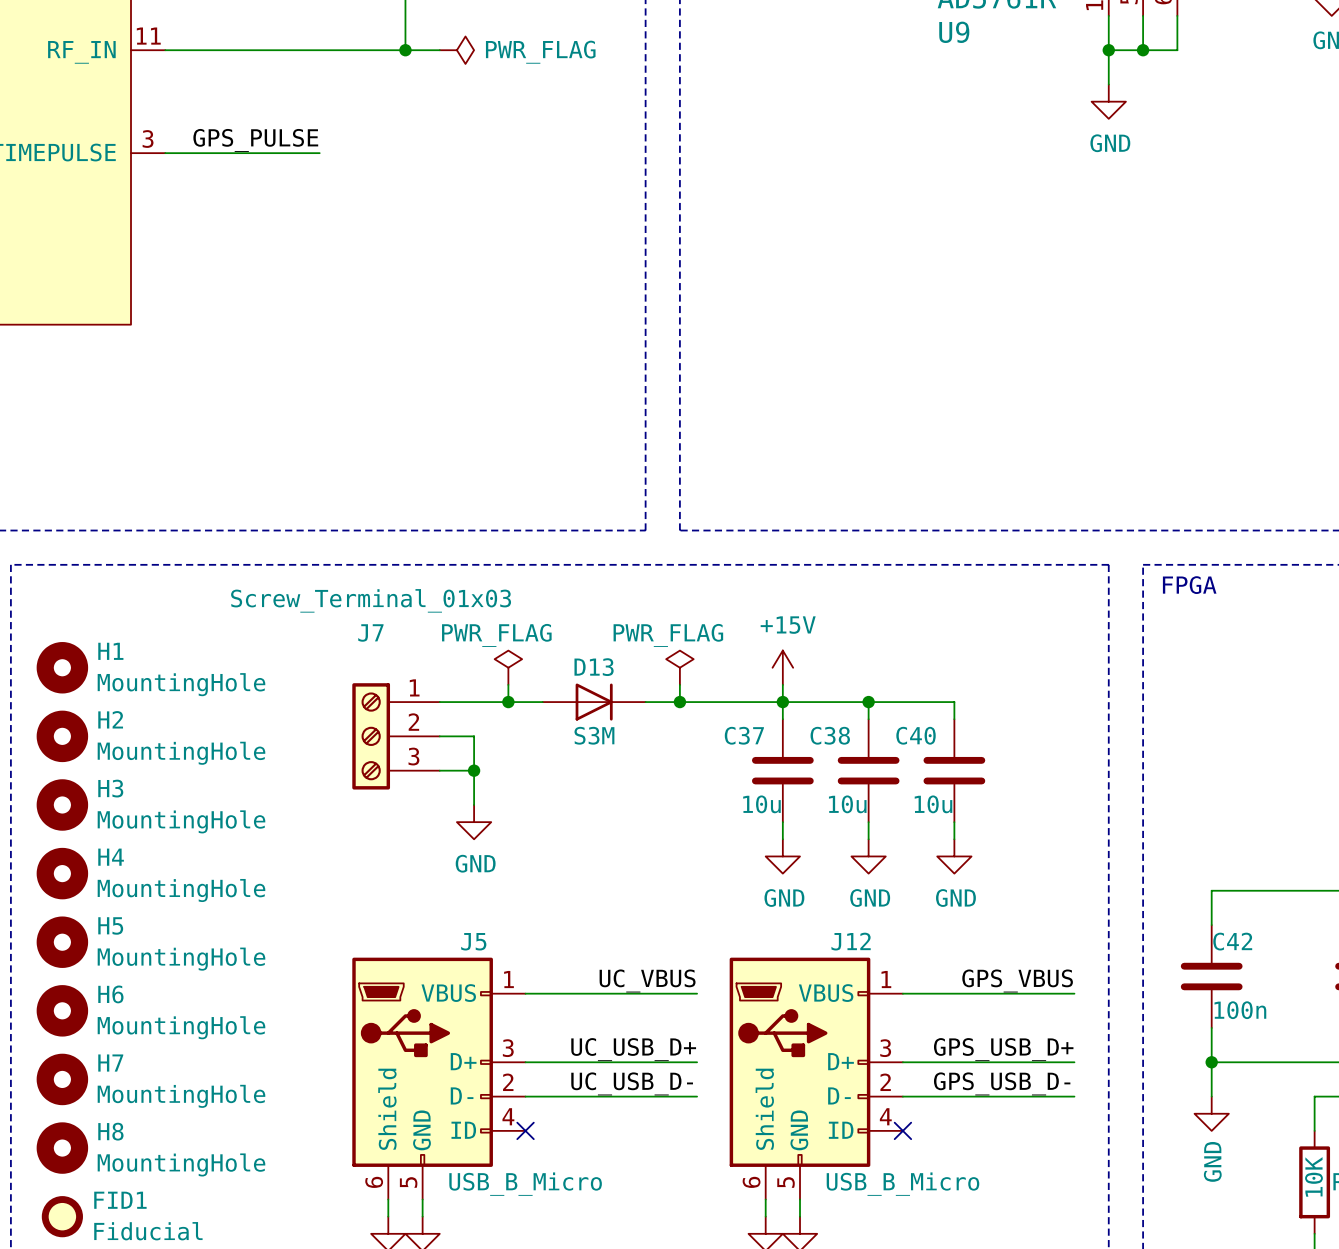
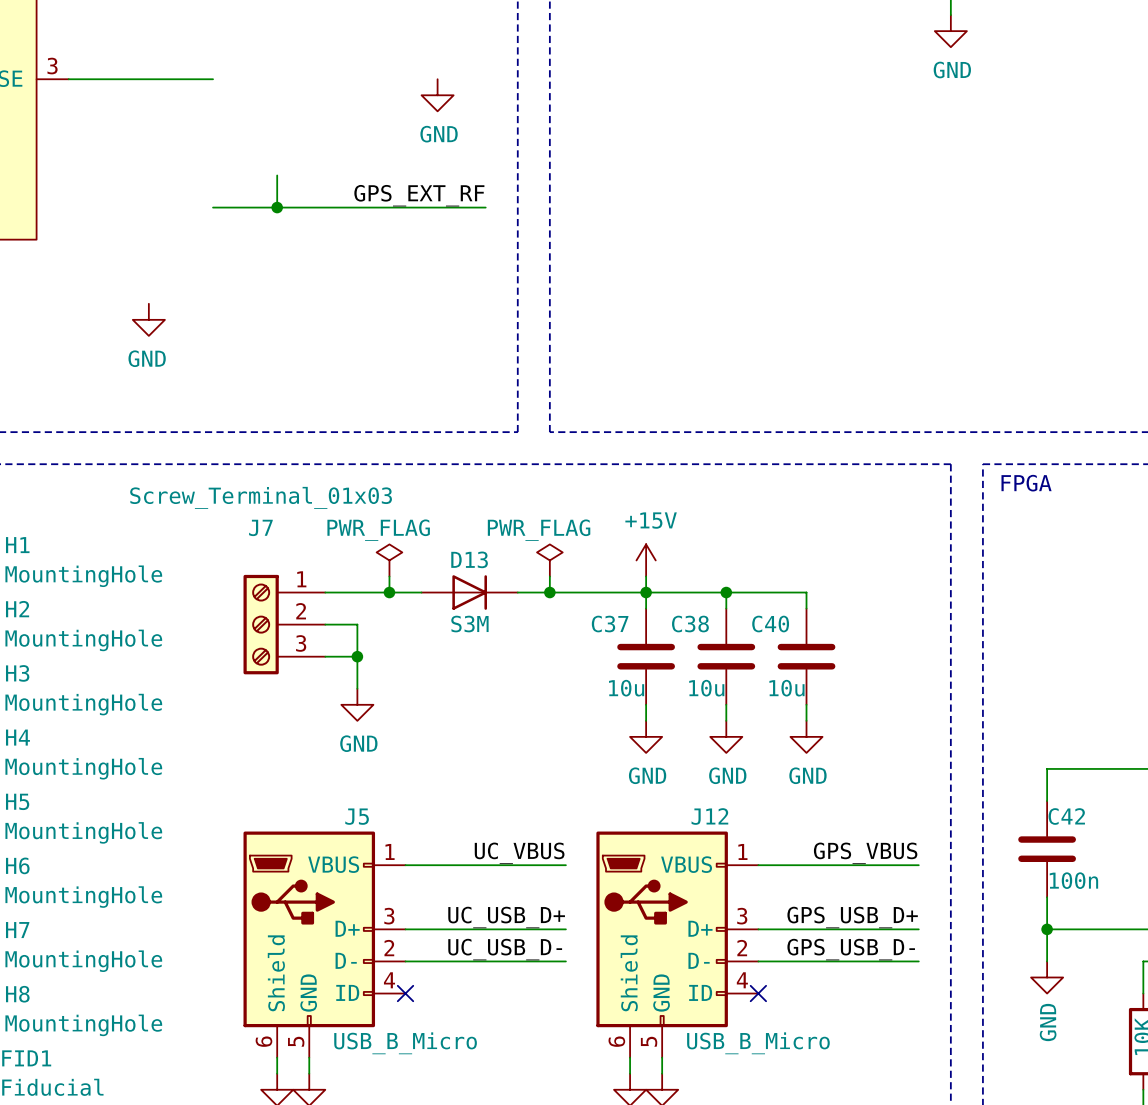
label: GPS_PULSE (255, 140) -> none
power symbol: none -> GND (437, 95)
wire: none -> (277, 175) (277, 207)
label: none -> GPS_EXT_RF (419, 195)
wire: none -> (213, 207) (485, 207)
junction: none -> (277, 207)
power symbol: none -> GND (148, 319)

